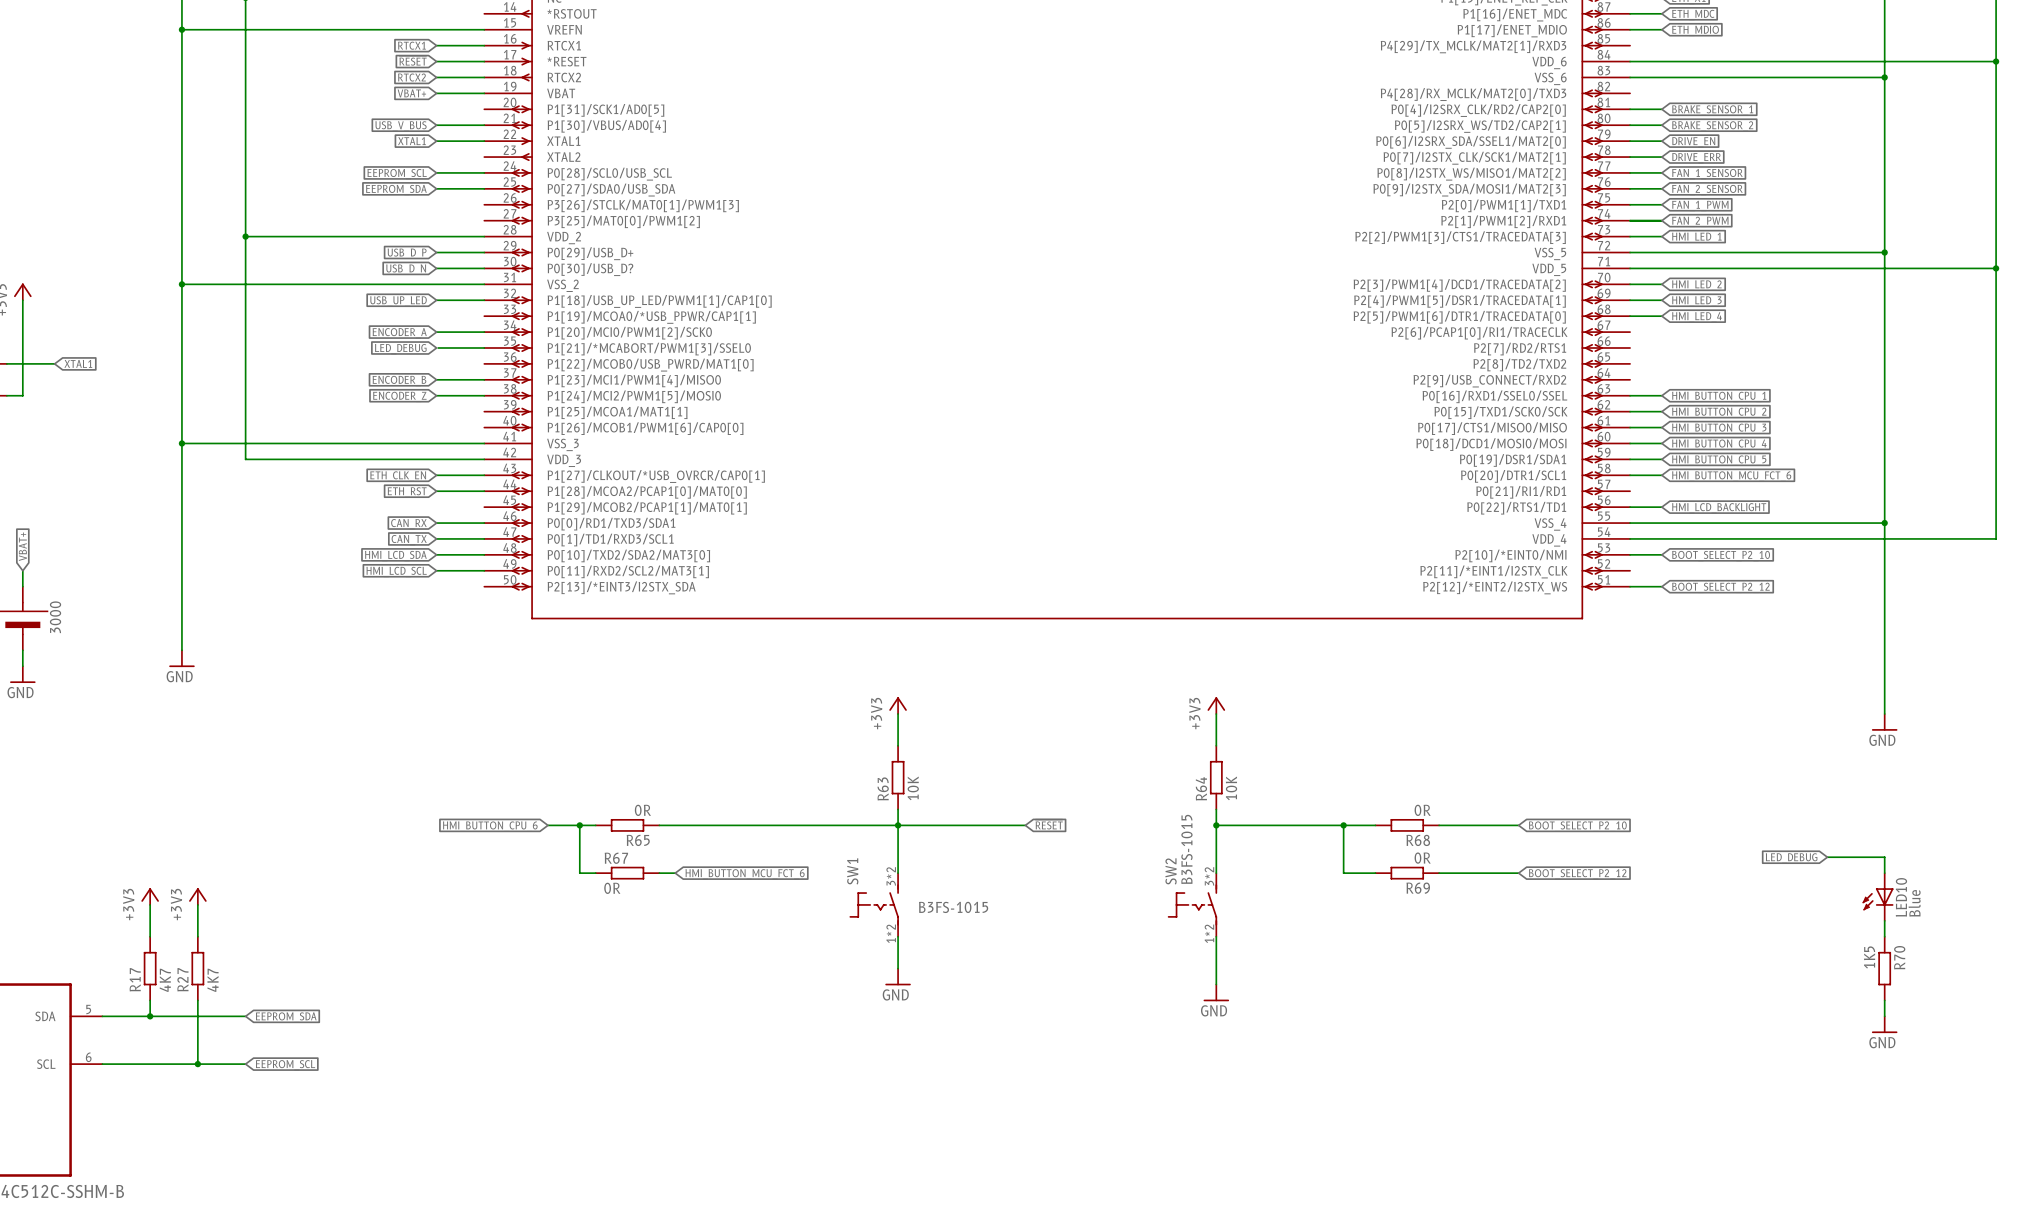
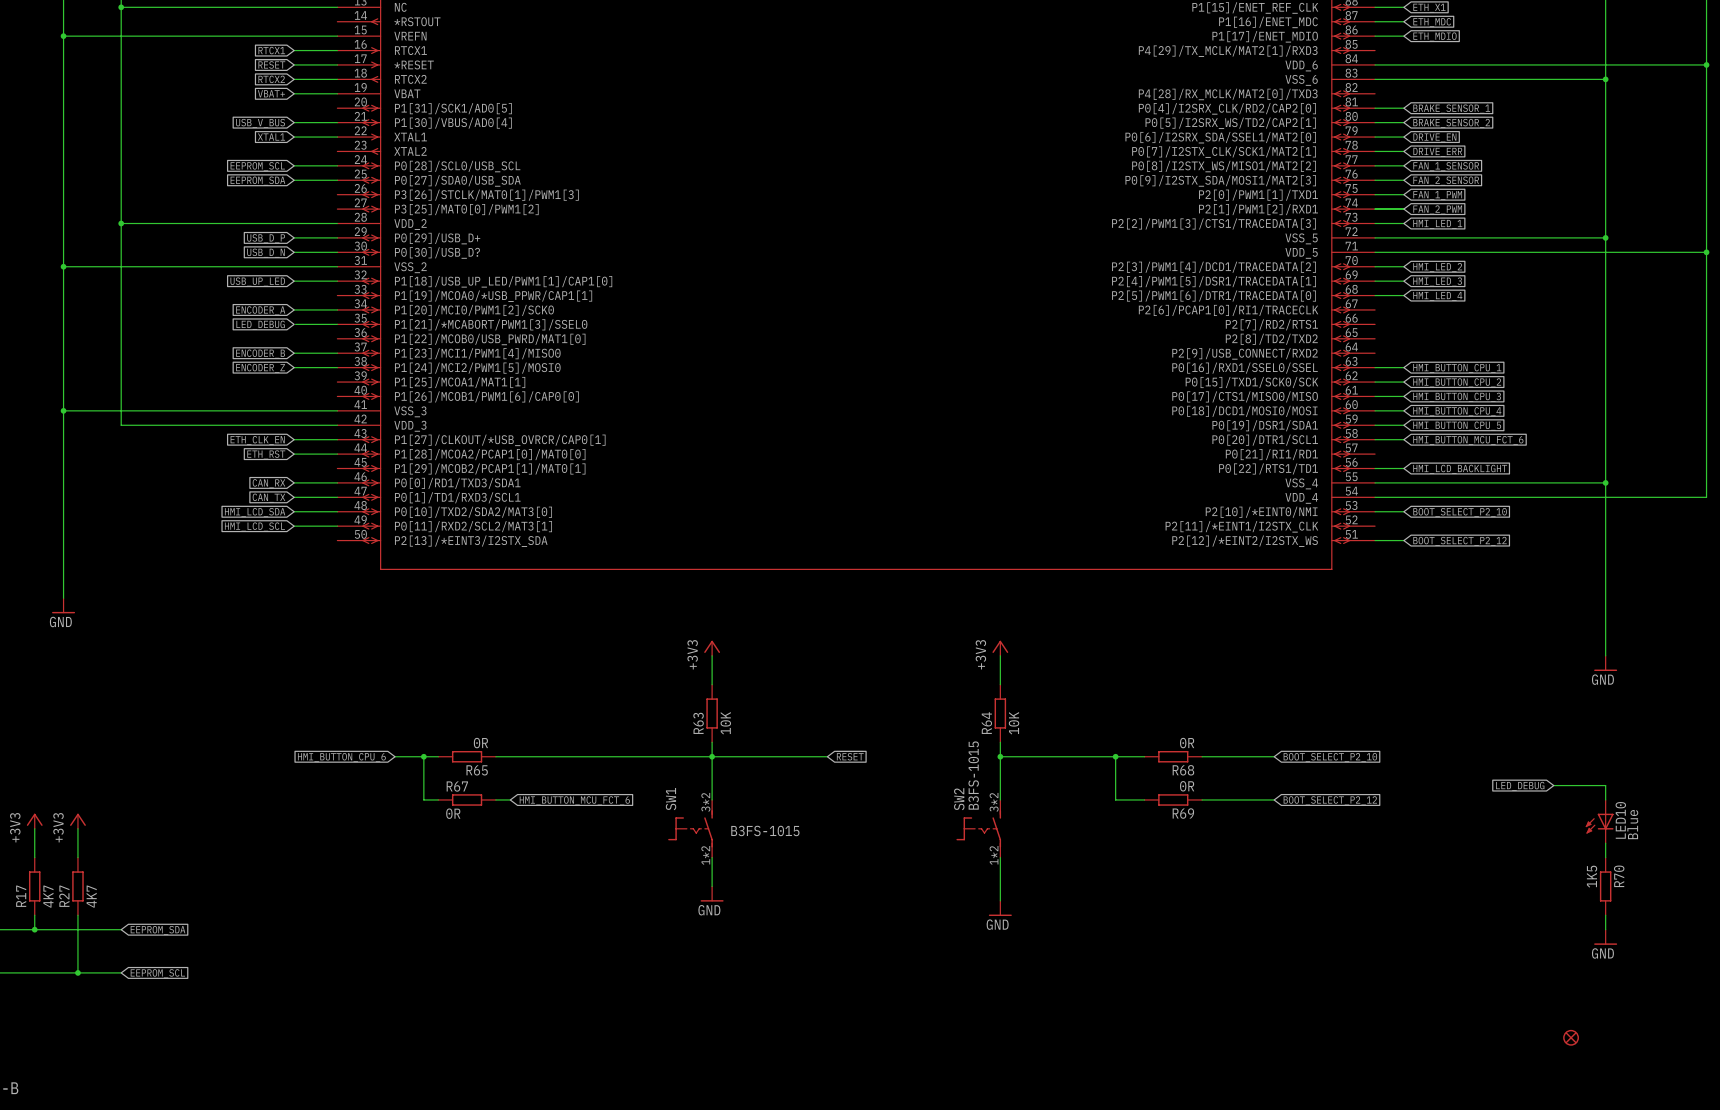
part: none -> (1571, 1037)

